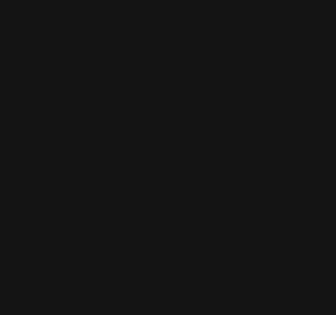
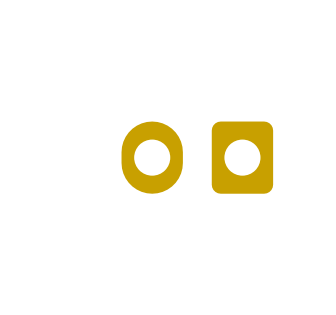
part: none -> (197, 157)

